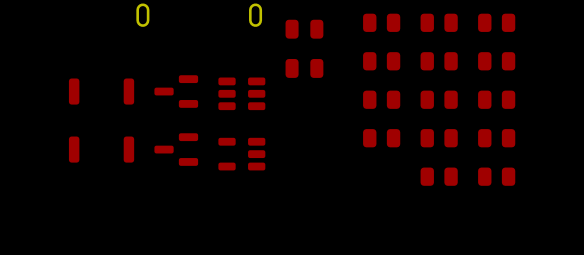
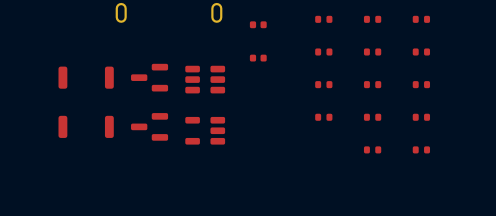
part footprint: [363, 13, 401, 32] -> [315, 15, 333, 23]
part footprint: [420, 13, 458, 32] -> [363, 15, 382, 23]
part footprint: [478, 13, 516, 32] -> [412, 15, 431, 23]
part footprint: [285, 19, 324, 39] -> [249, 21, 267, 29]
part footprint: [363, 52, 401, 71] -> [315, 48, 333, 56]
part footprint: [420, 52, 458, 71] -> [363, 48, 382, 56]
part footprint: [478, 52, 516, 71] -> [412, 48, 431, 56]
part footprint: [285, 58, 324, 78] -> [249, 54, 267, 62]
part footprint: [363, 90, 401, 109] -> [315, 81, 333, 89]
part footprint: [420, 90, 458, 109] -> [363, 81, 382, 89]
part footprint: [478, 90, 516, 109] -> [412, 81, 431, 89]
part footprint: [363, 129, 401, 148] -> [315, 113, 333, 121]
part footprint: [420, 129, 458, 148] -> [363, 113, 382, 121]
part footprint: [478, 129, 516, 148] -> [412, 113, 431, 121]
part footprint: [420, 167, 458, 186] -> [363, 146, 382, 154]
part footprint: [478, 167, 516, 186] -> [412, 146, 431, 154]

